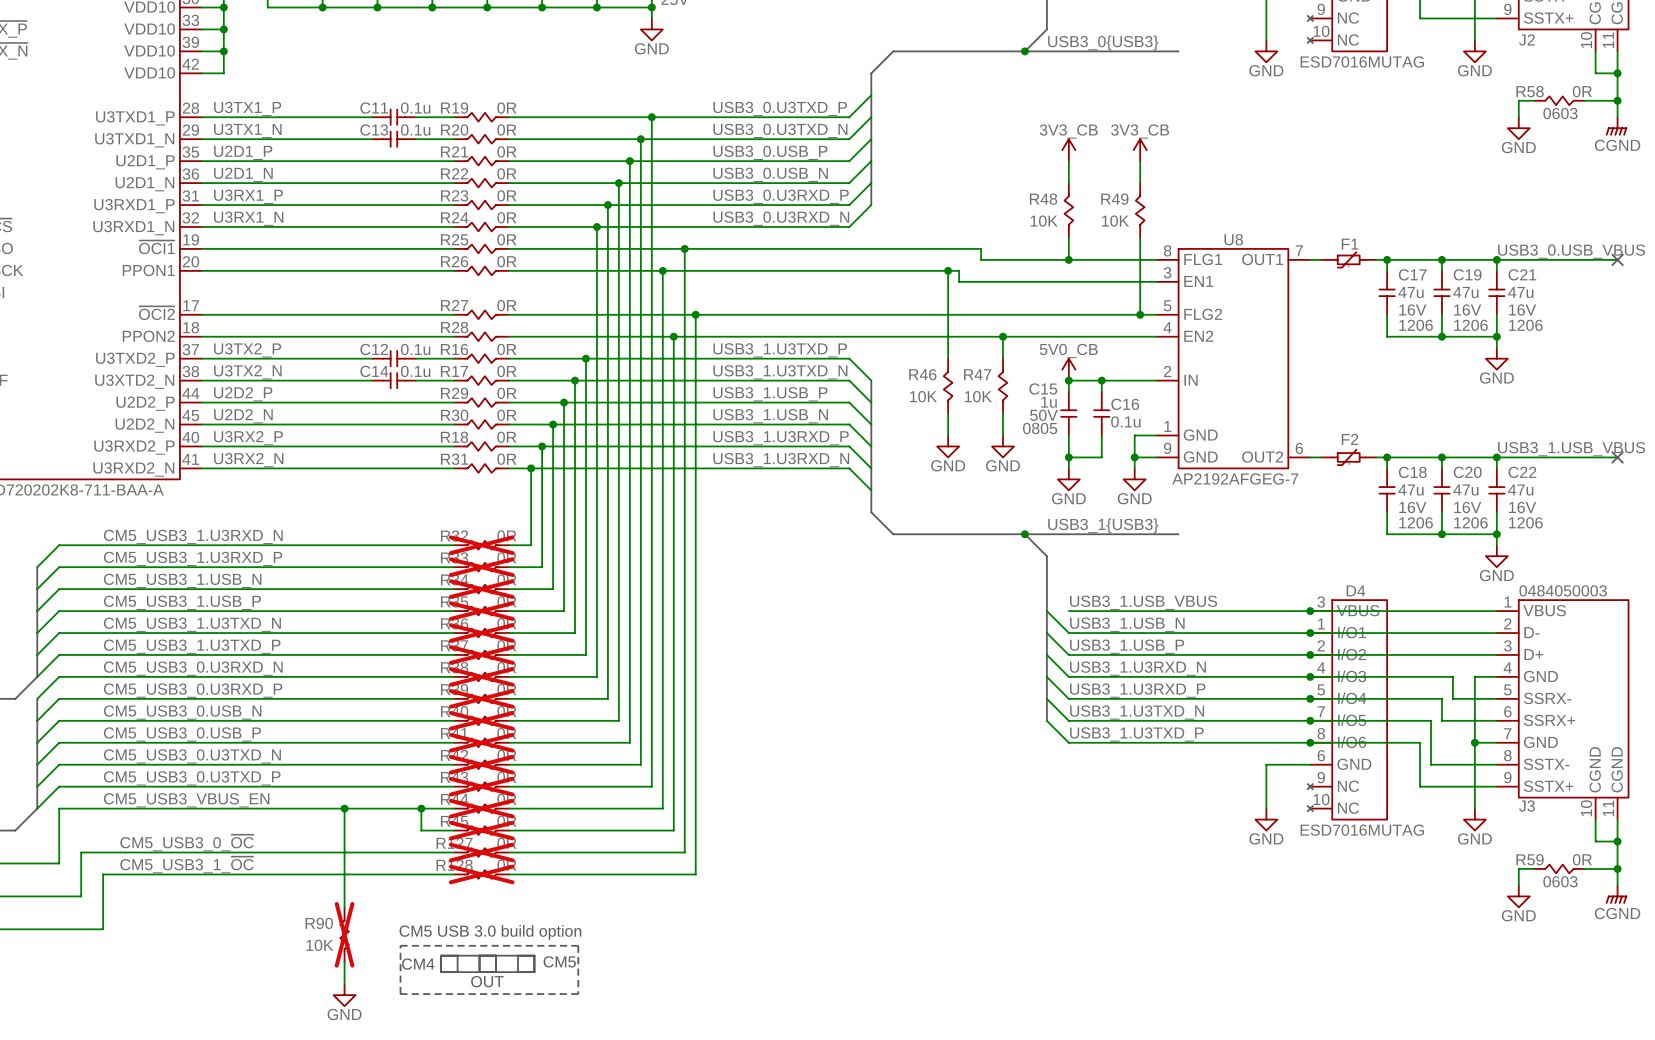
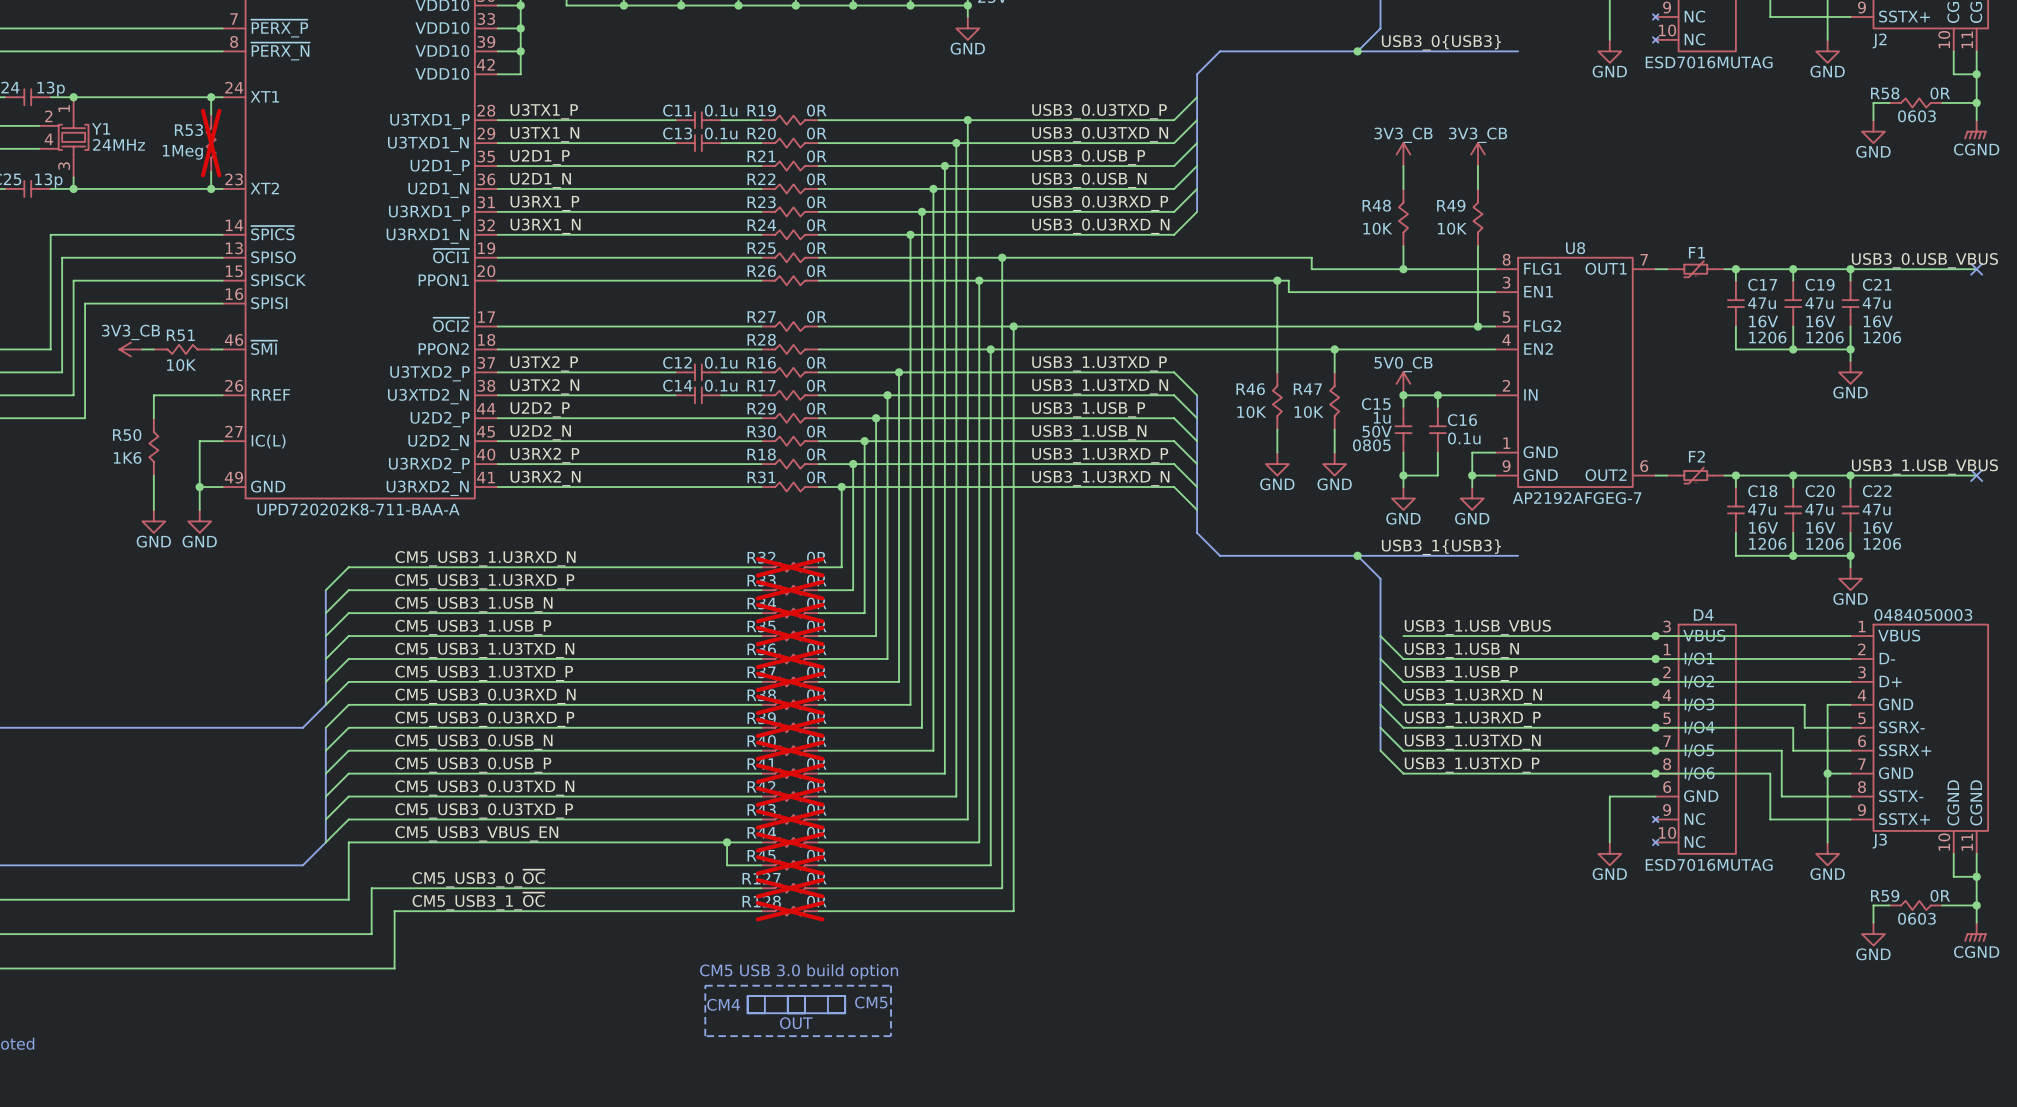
wire: (344, 808) (344, 907) -> none
junction: (344, 808) -> none
R90: 10K (344, 934) -> none
wire: (344, 962) (344, 984) -> none
power symbol: GND (344, 995) -> none

